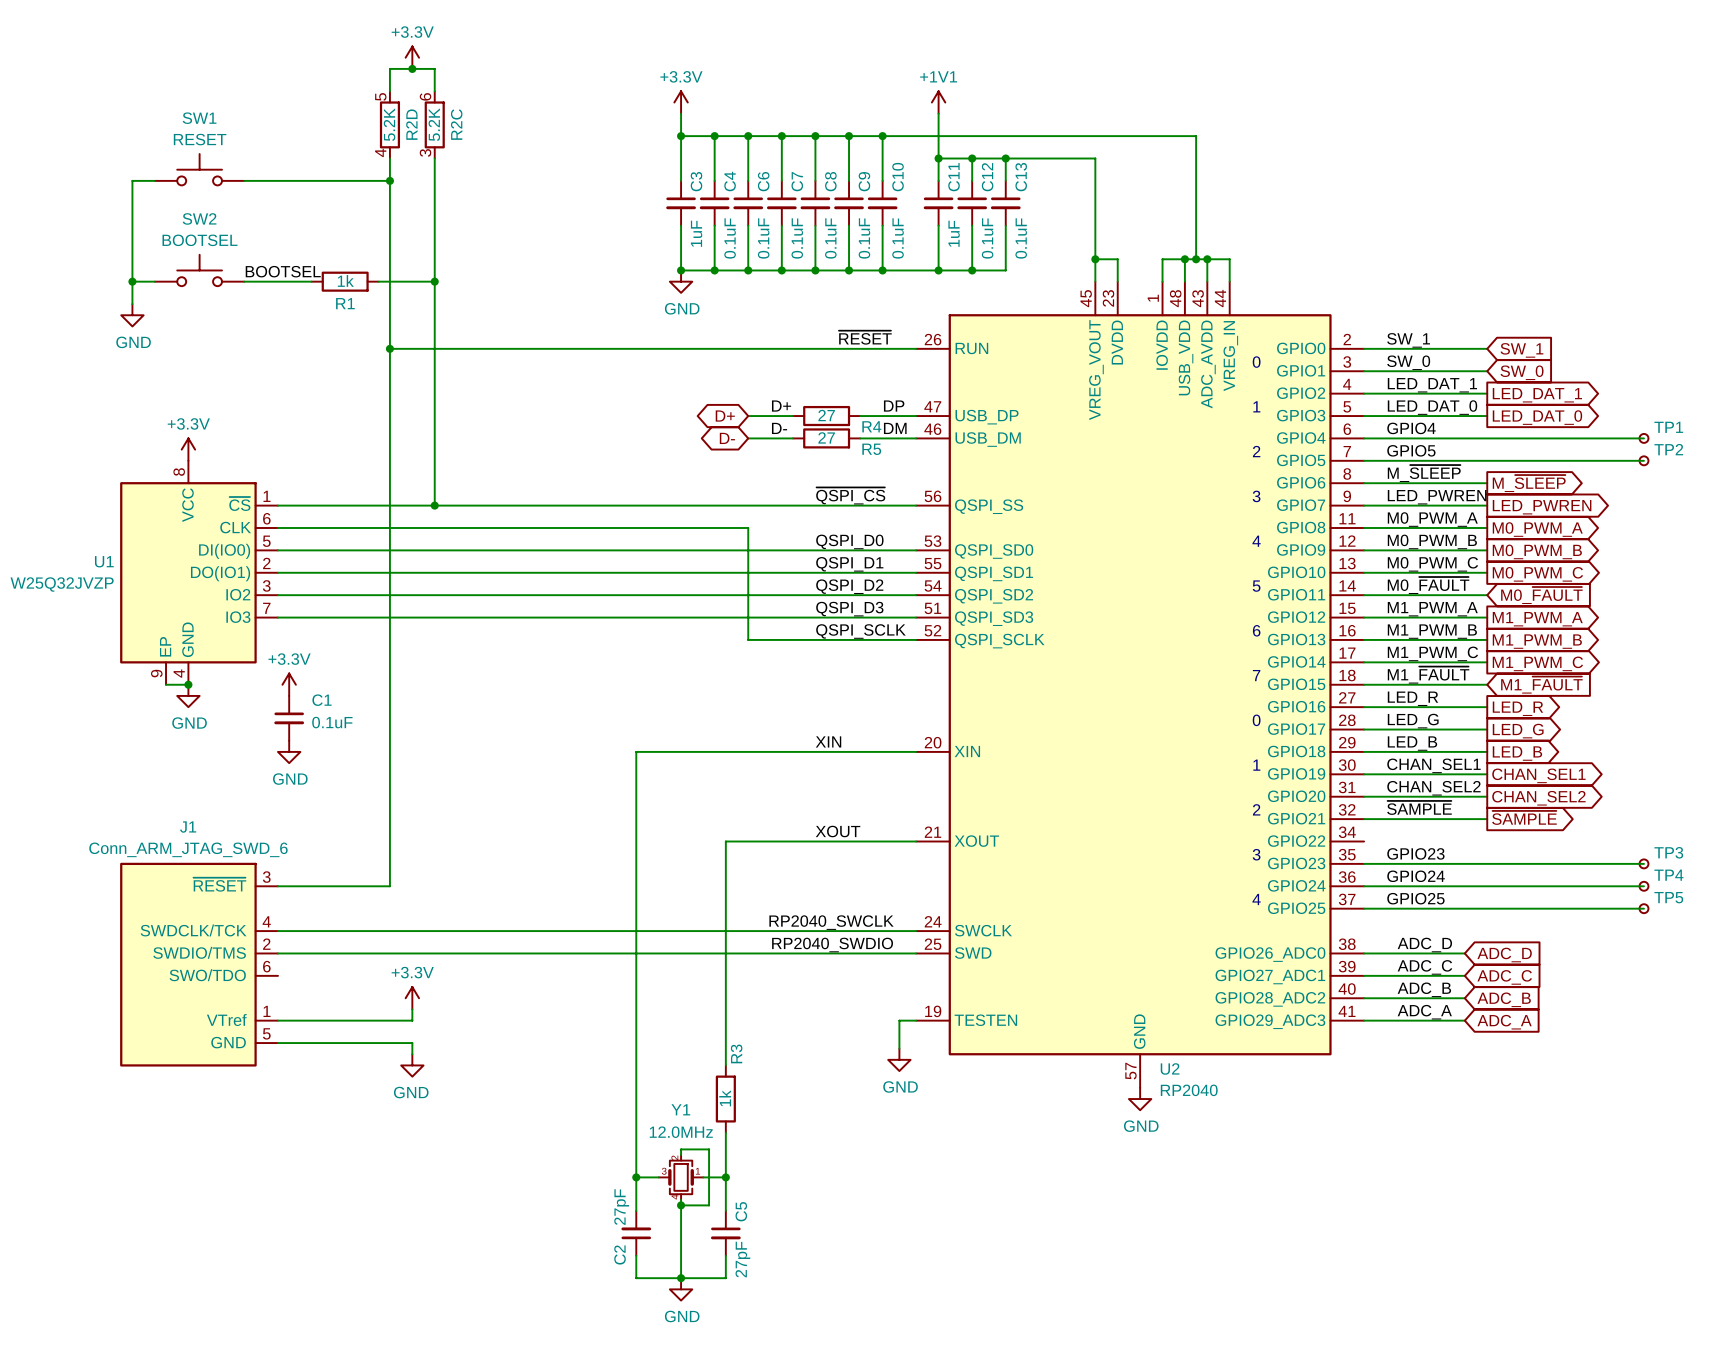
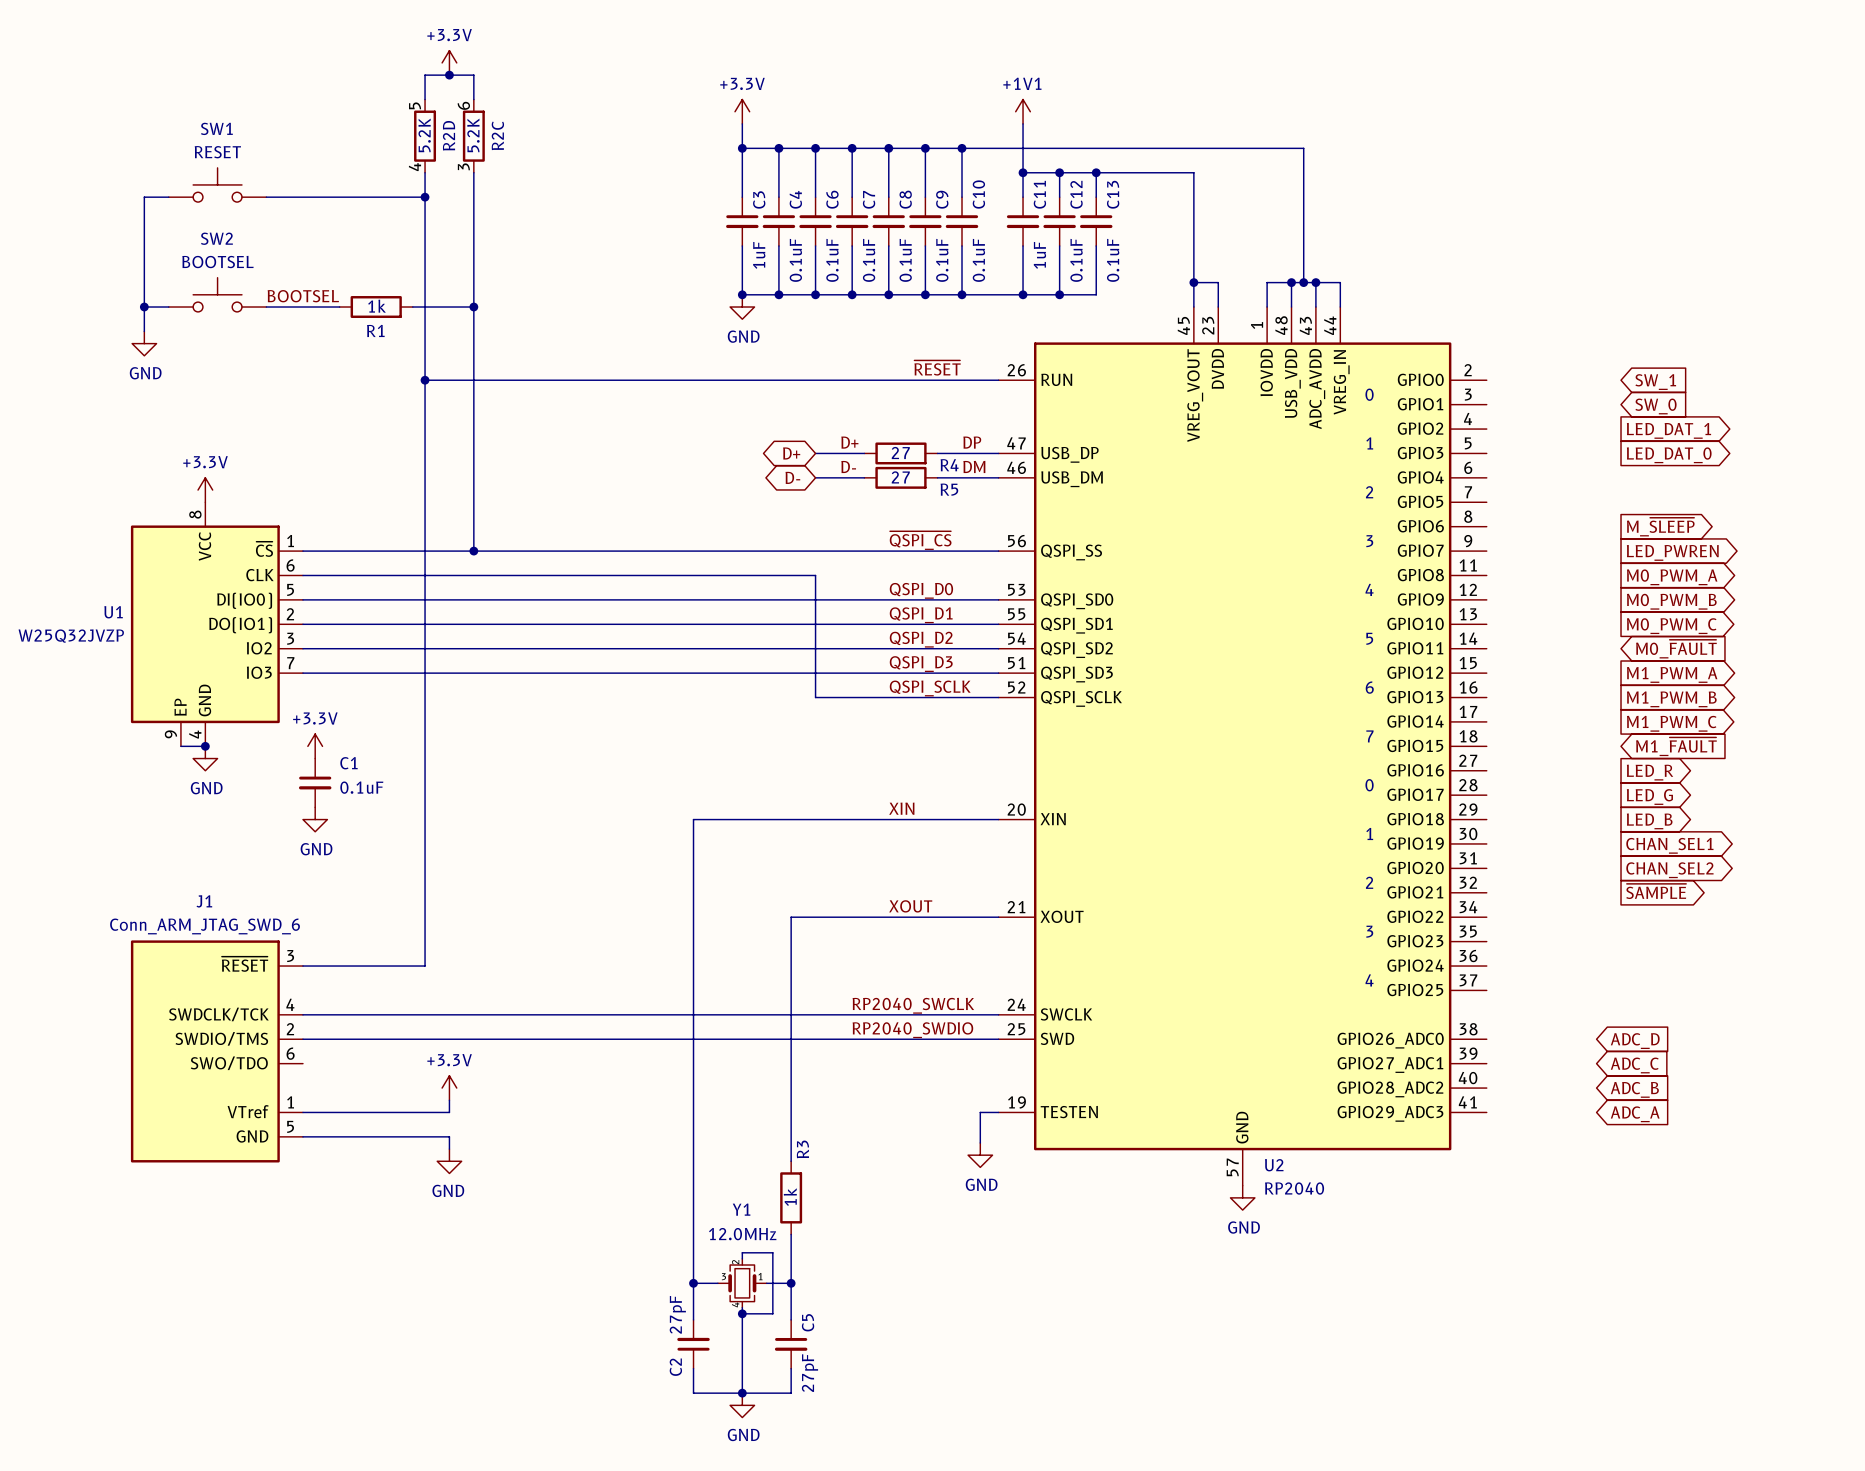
label: SW_1 (1408, 340) -> none
wire: (1364, 348) (1487, 348) -> none
label: SW_0 (1408, 362) -> none
wire: (1364, 371) (1487, 371) -> none
label: LED_DAT_1 (1432, 385) -> none
wire: (1364, 393) (1487, 393) -> none
label: LED_DAT_0 (1432, 407) -> none
wire: (1364, 416) (1487, 416) -> none
label: GPIO4 (1411, 428) -> none
wire: (1364, 438) (1643, 438) -> none
TP1: (1643, 438) -> none
label: GPIO5 (1411, 450) -> none
wire: (1364, 460) (1643, 460) -> none
TP2: (1643, 460) -> none
label: M_~{SLEEP} (1424, 473) -> none
wire: (1364, 483) (1487, 483) -> none
label: LED_PWREN (1437, 497) -> none
wire: (1364, 505) (1487, 505) -> none
label: M0_PWM_A (1432, 519) -> none
wire: (1364, 527) (1487, 527) -> none
label: M0_PWM_B (1432, 541) -> none
wire: (1364, 550) (1487, 550) -> none
label: M0_PWM_C (1432, 564) -> none
wire: (1364, 572) (1487, 572) -> none
label: M0_~{FAULT} (1428, 585) -> none
wire: (1364, 595) (1487, 595) -> none
label: M1_PWM_A (1432, 609) -> none
wire: (1364, 617) (1487, 617) -> none
label: M1_PWM_B (1432, 631) -> none
wire: (1364, 639) (1487, 639) -> none
label: M1_PWM_C (1432, 653) -> none
wire: (1364, 662) (1487, 662) -> none
label: M1_~{FAULT} (1428, 675) -> none
wire: (1364, 684) (1487, 684) -> none
label: LED_R (1412, 698) -> none
wire: (1364, 707) (1487, 707) -> none
label: LED_G (1413, 721) -> none
wire: (1364, 729) (1487, 729) -> none
label: LED_B (1412, 743) -> none
wire: (1364, 751) (1487, 751) -> none
label: CHAN_SEL1 (1433, 765) -> none
wire: (1364, 774) (1487, 774) -> none
label: CHAN_SEL2 (1433, 788) -> none
wire: (1364, 796) (1487, 796) -> none
label: ~{SAMPLE} (1419, 807) -> none
wire: (1364, 819) (1487, 819) -> none
label: GPIO23 (1415, 853) -> none
wire: (1364, 863) (1643, 863) -> none
TP3: (1643, 863) -> none
label: GPIO24 (1416, 876) -> none
wire: (1364, 886) (1643, 886) -> none
TP4: (1643, 886) -> none
label: GPIO25 (1415, 898) -> none
wire: (1364, 908) (1643, 908) -> none
TP5: (1643, 908) -> none
label: ADC_D (1424, 945) -> none
wire: (1364, 953) (1464, 953) -> none
label: ADC_C (1424, 967) -> none
wire: (1364, 975) (1464, 975) -> none
label: ADC_B (1424, 989) -> none
wire: (1364, 998) (1464, 998) -> none
label: ADC_A (1424, 1012) -> none
wire: (1364, 1020) (1464, 1020) -> none

